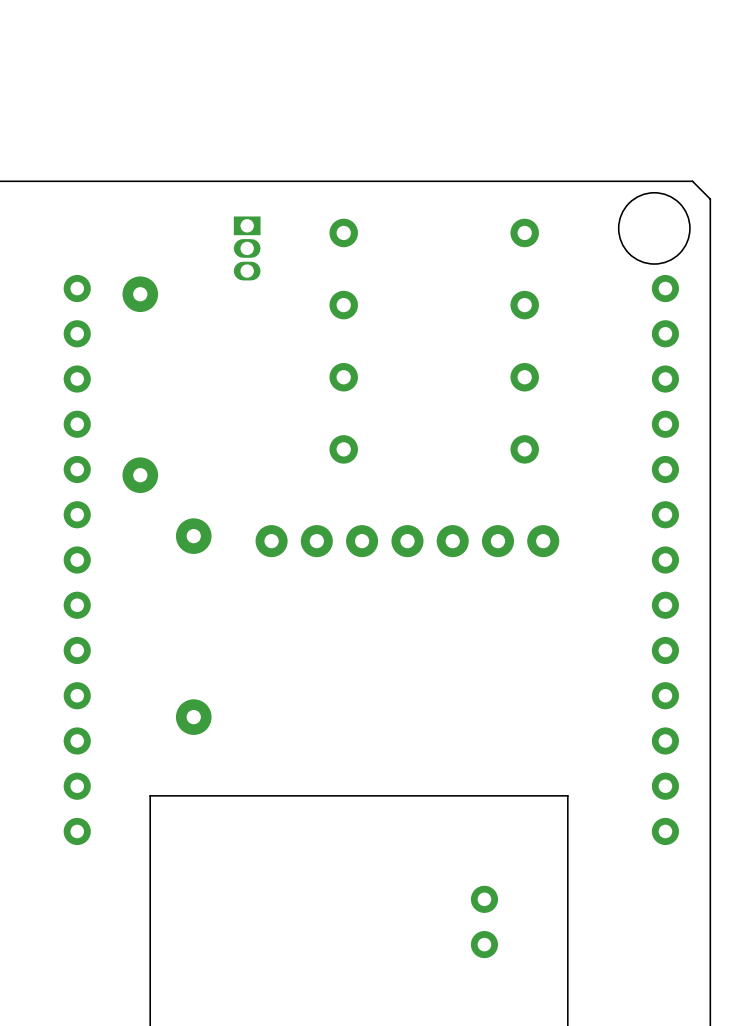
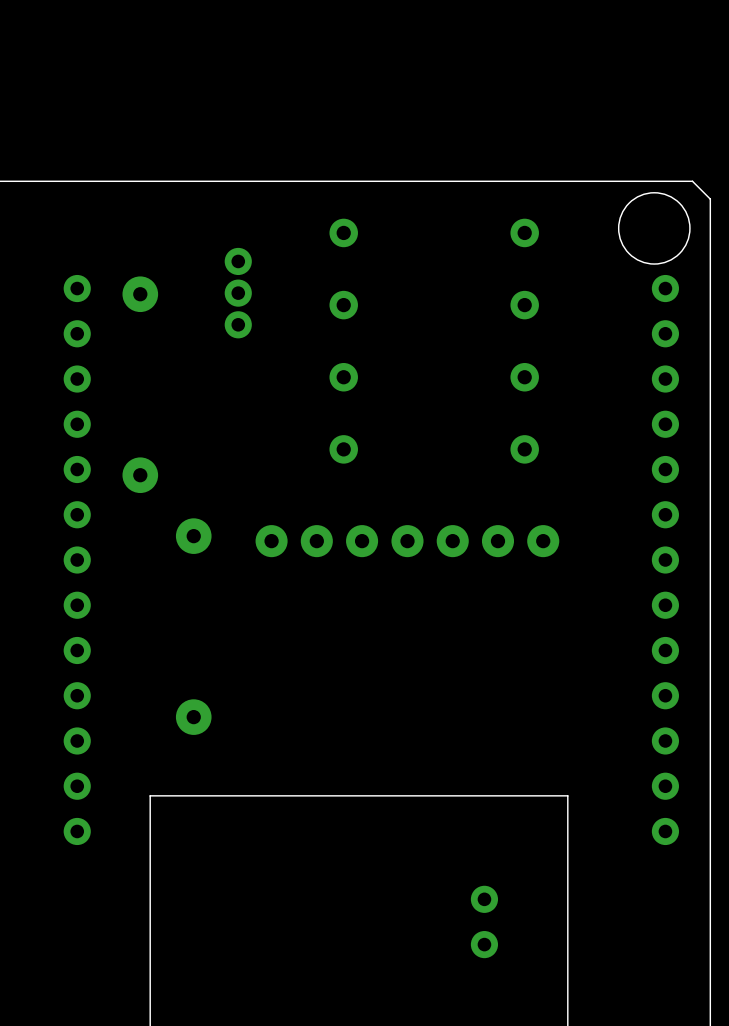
part: (247, 248) -> none
part: none -> (238, 293)

